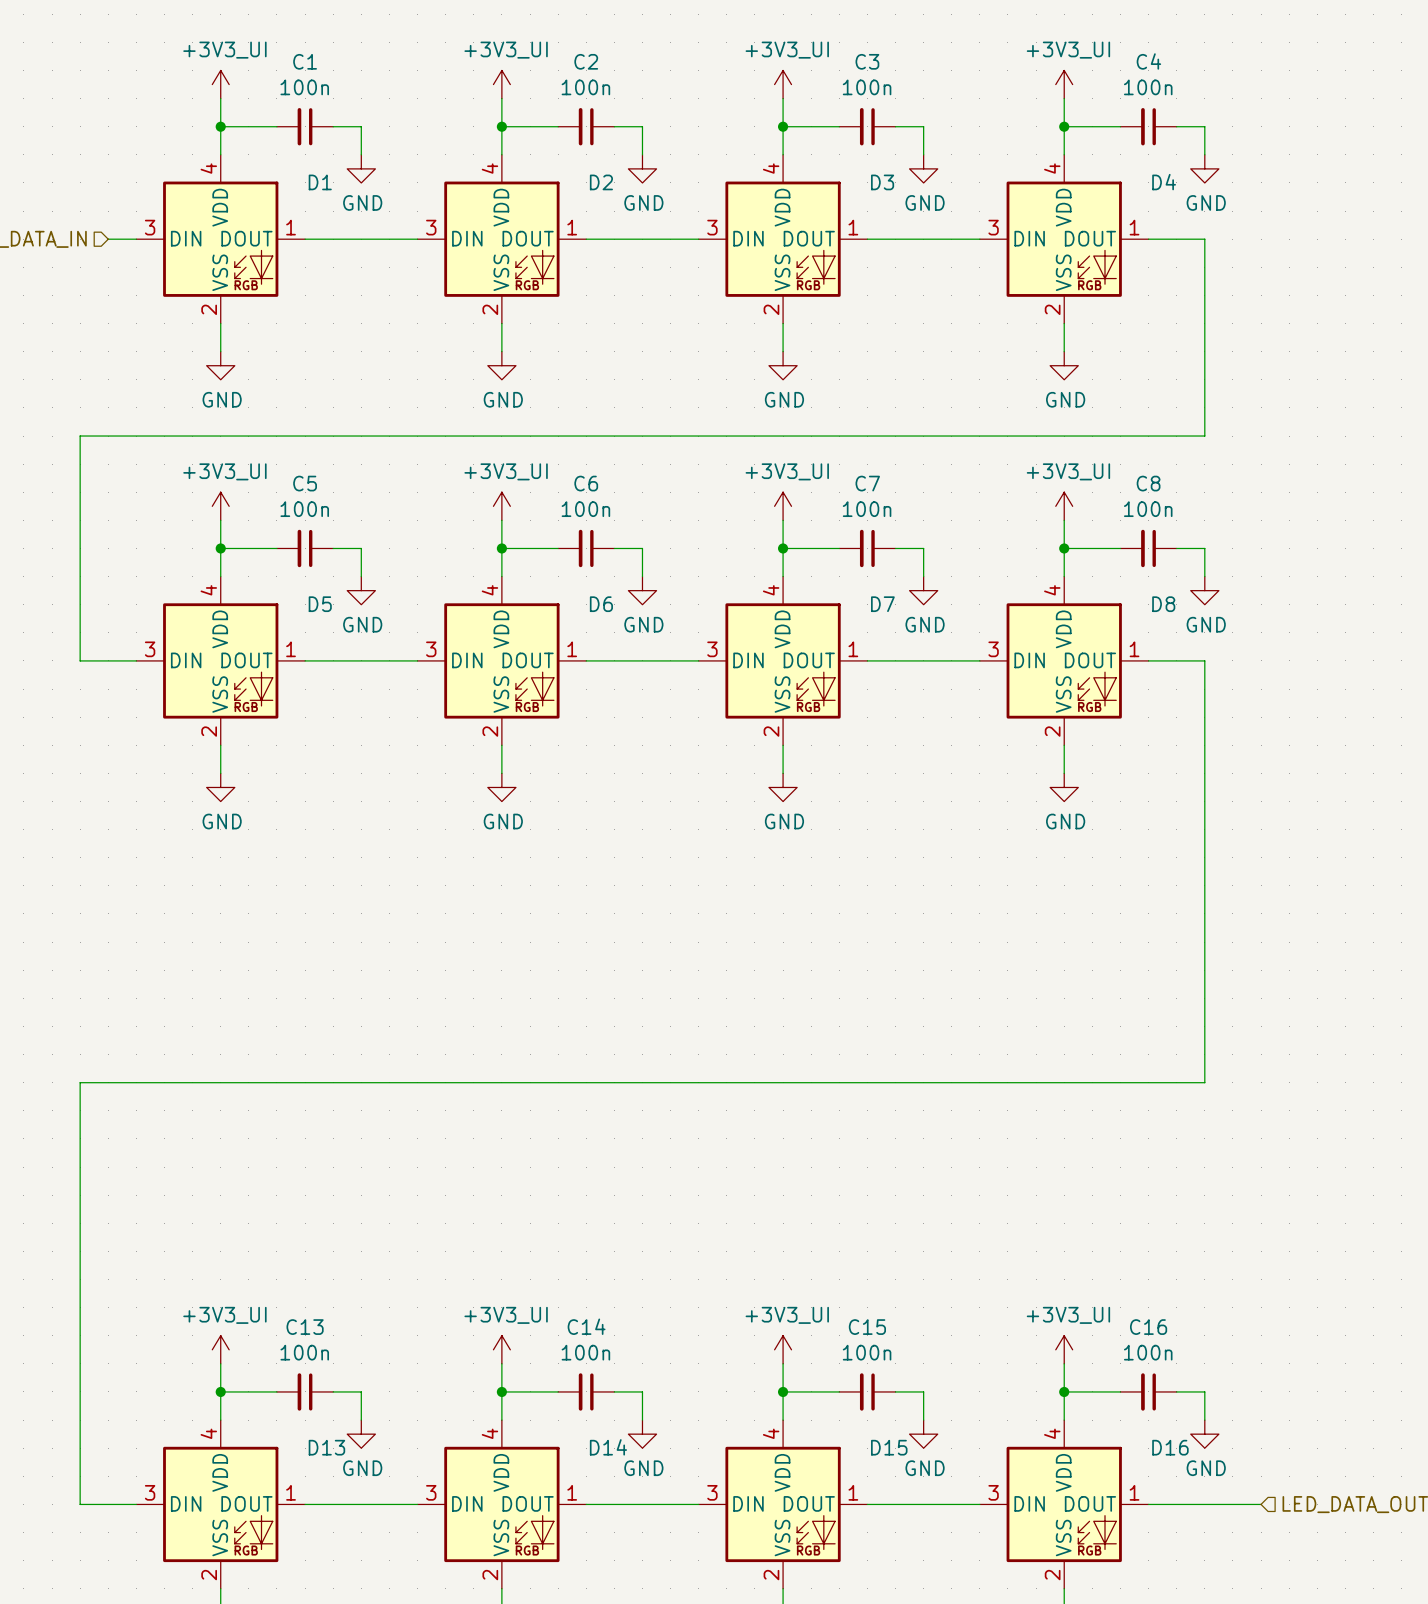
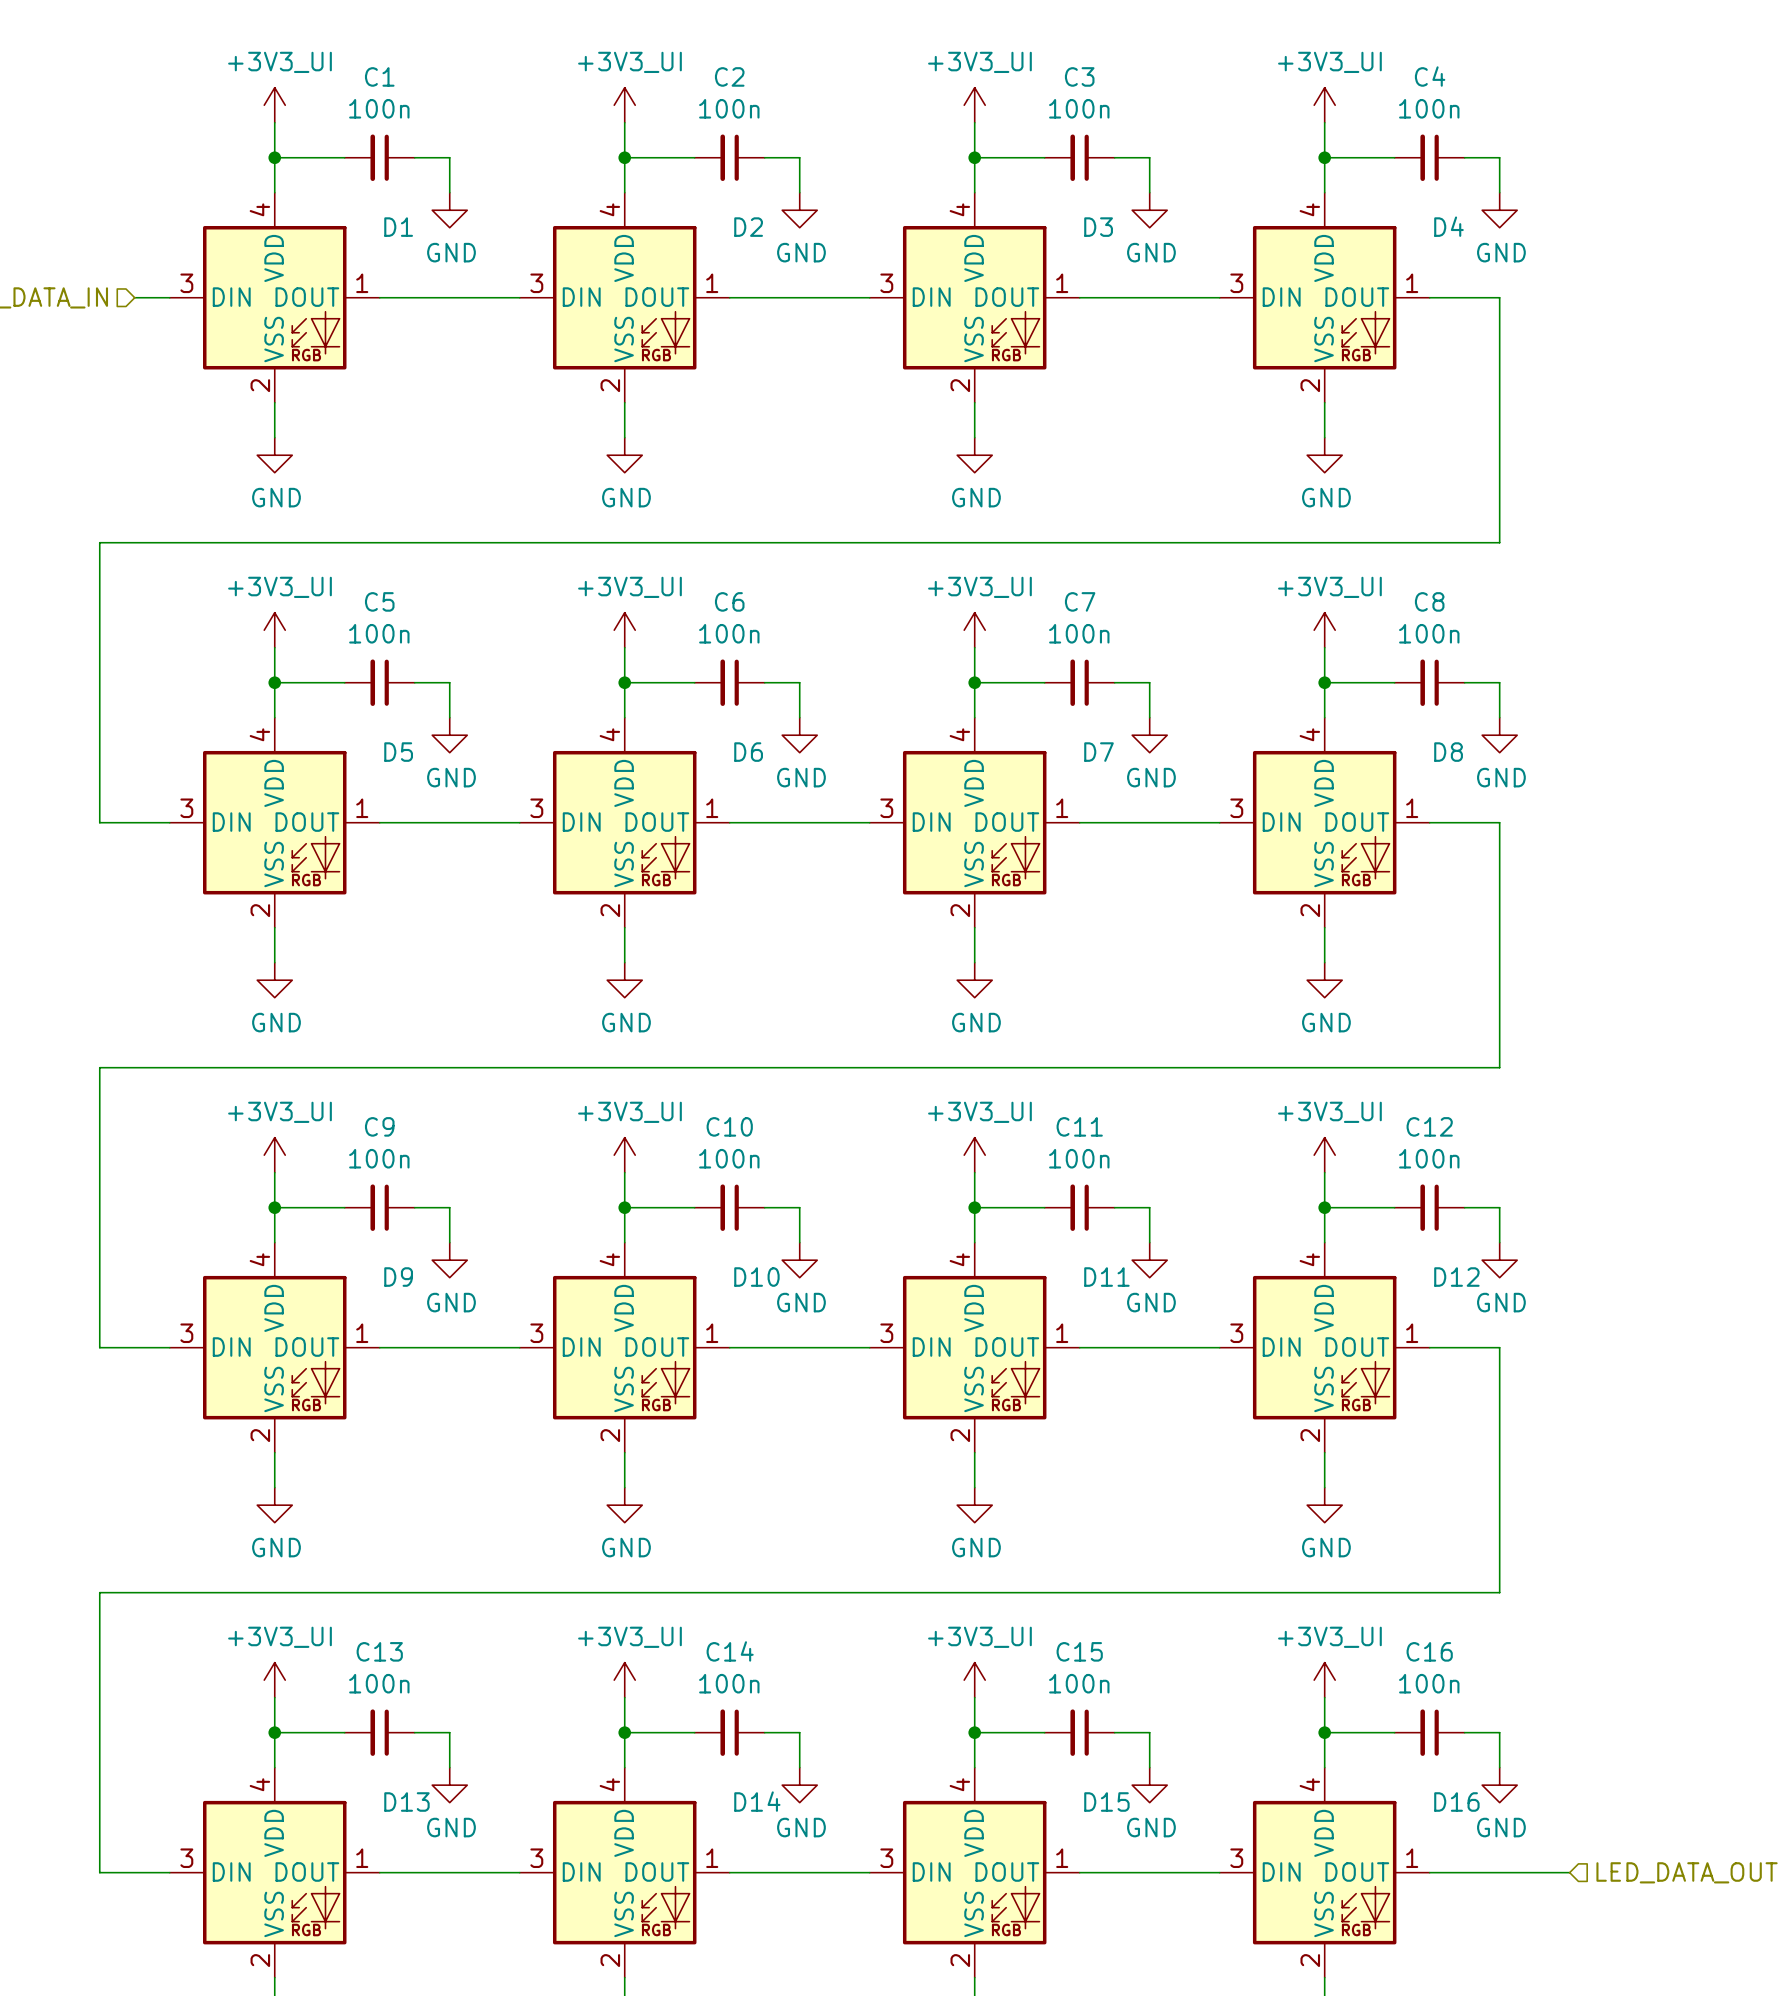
wire: (1204, 857) (1204, 970) -> (1464, 1207) (1499, 1207)
wire: none -> (1499, 1067) (99, 1067) (99, 1347)
power symbol: none -> +3V3_UI (274, 1155)
power symbol: none -> +3V3_UI (624, 1155)
power symbol: none -> +3V3_UI (974, 1155)
power symbol: none -> +3V3_UI (1324, 1155)
wire: none -> (274, 1172) (274, 1242)
wire: none -> (624, 1172) (624, 1242)
wire: none -> (974, 1172) (974, 1242)
wire: none -> (1324, 1172) (1324, 1242)
wire: none -> (274, 1207) (344, 1207)
junction: none -> (274, 1207)
C9: none -> 100n (379, 1207)
wire: none -> (414, 1207) (449, 1207) (449, 1242)
wire: none -> (624, 1207) (694, 1207)
junction: none -> (624, 1207)
C10: none -> 100n (729, 1207)
wire: none -> (764, 1207) (799, 1207) (799, 1242)
wire: none -> (974, 1207) (1044, 1207)
junction: none -> (974, 1207)
C11: none -> 100n (1079, 1207)
wire: none -> (1114, 1207) (1149, 1207) (1149, 1242)
wire: none -> (1324, 1207) (1394, 1207)
junction: none -> (1324, 1207)
C12: none -> 100n (1429, 1207)
wire: (1204, 998) (1204, 1082) -> none
power symbol: none -> GND (449, 1260)
power symbol: none -> GND (799, 1260)
power symbol: none -> GND (1149, 1260)
power symbol: none -> GND (1499, 1260)
wire: (80, 1082) (80, 1279) -> (1499, 1347) (1499, 1592) (99, 1592)
D9: none -> (274, 1347)
D10: none -> (624, 1347)
D11: none -> (974, 1347)
D12: none -> (1324, 1347)
wire: none -> (274, 1452) (274, 1487)
wire: none -> (624, 1452) (624, 1487)
wire: none -> (974, 1452) (974, 1487)
wire: none -> (1324, 1452) (1324, 1487)
power symbol: none -> GND (274, 1505)
power symbol: none -> GND (624, 1505)
power symbol: none -> GND (974, 1505)
power symbol: none -> GND (1324, 1505)

